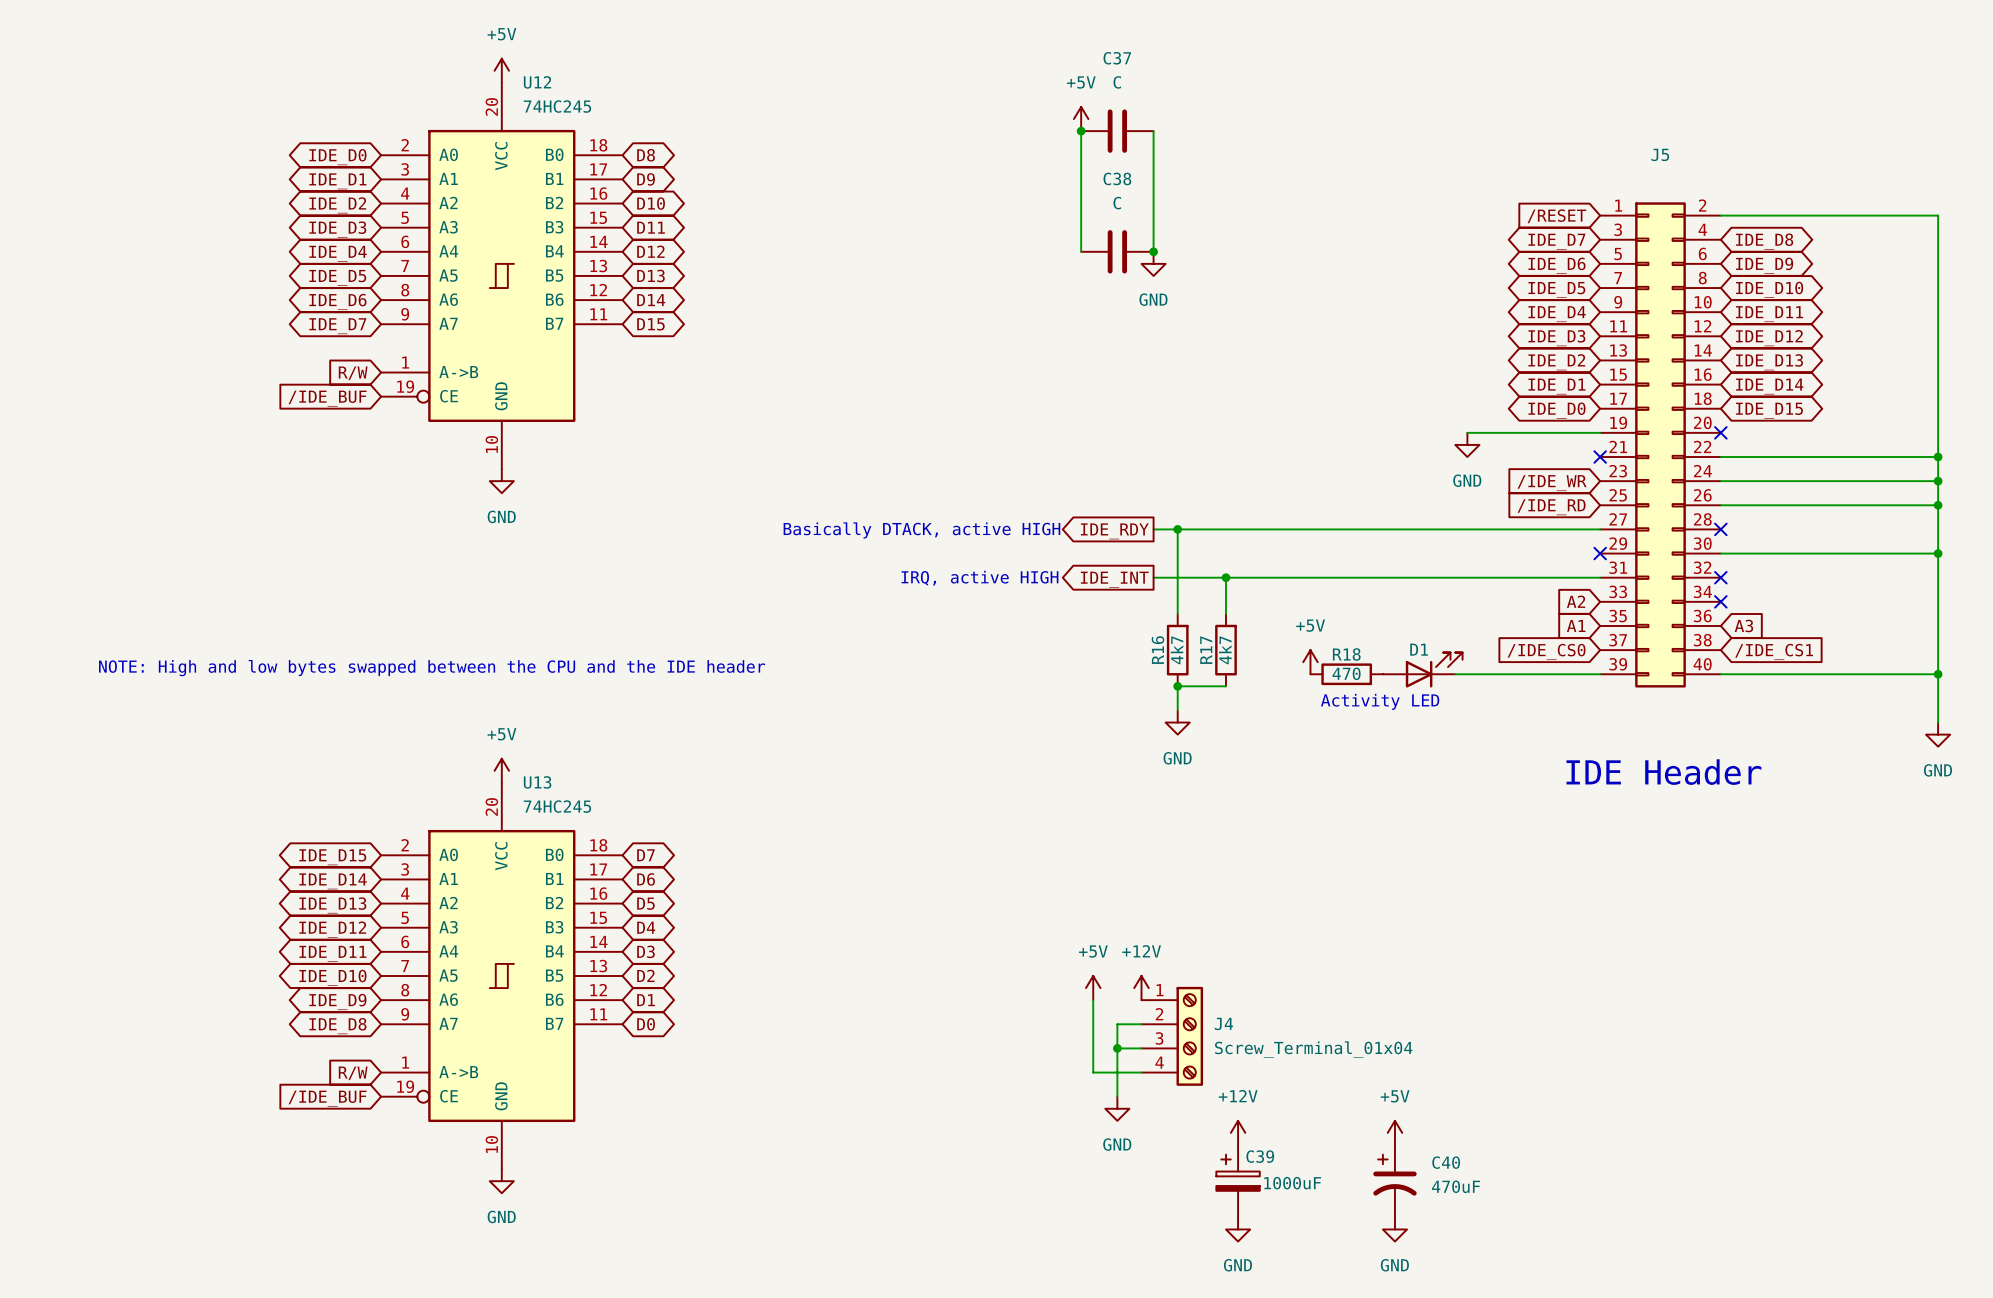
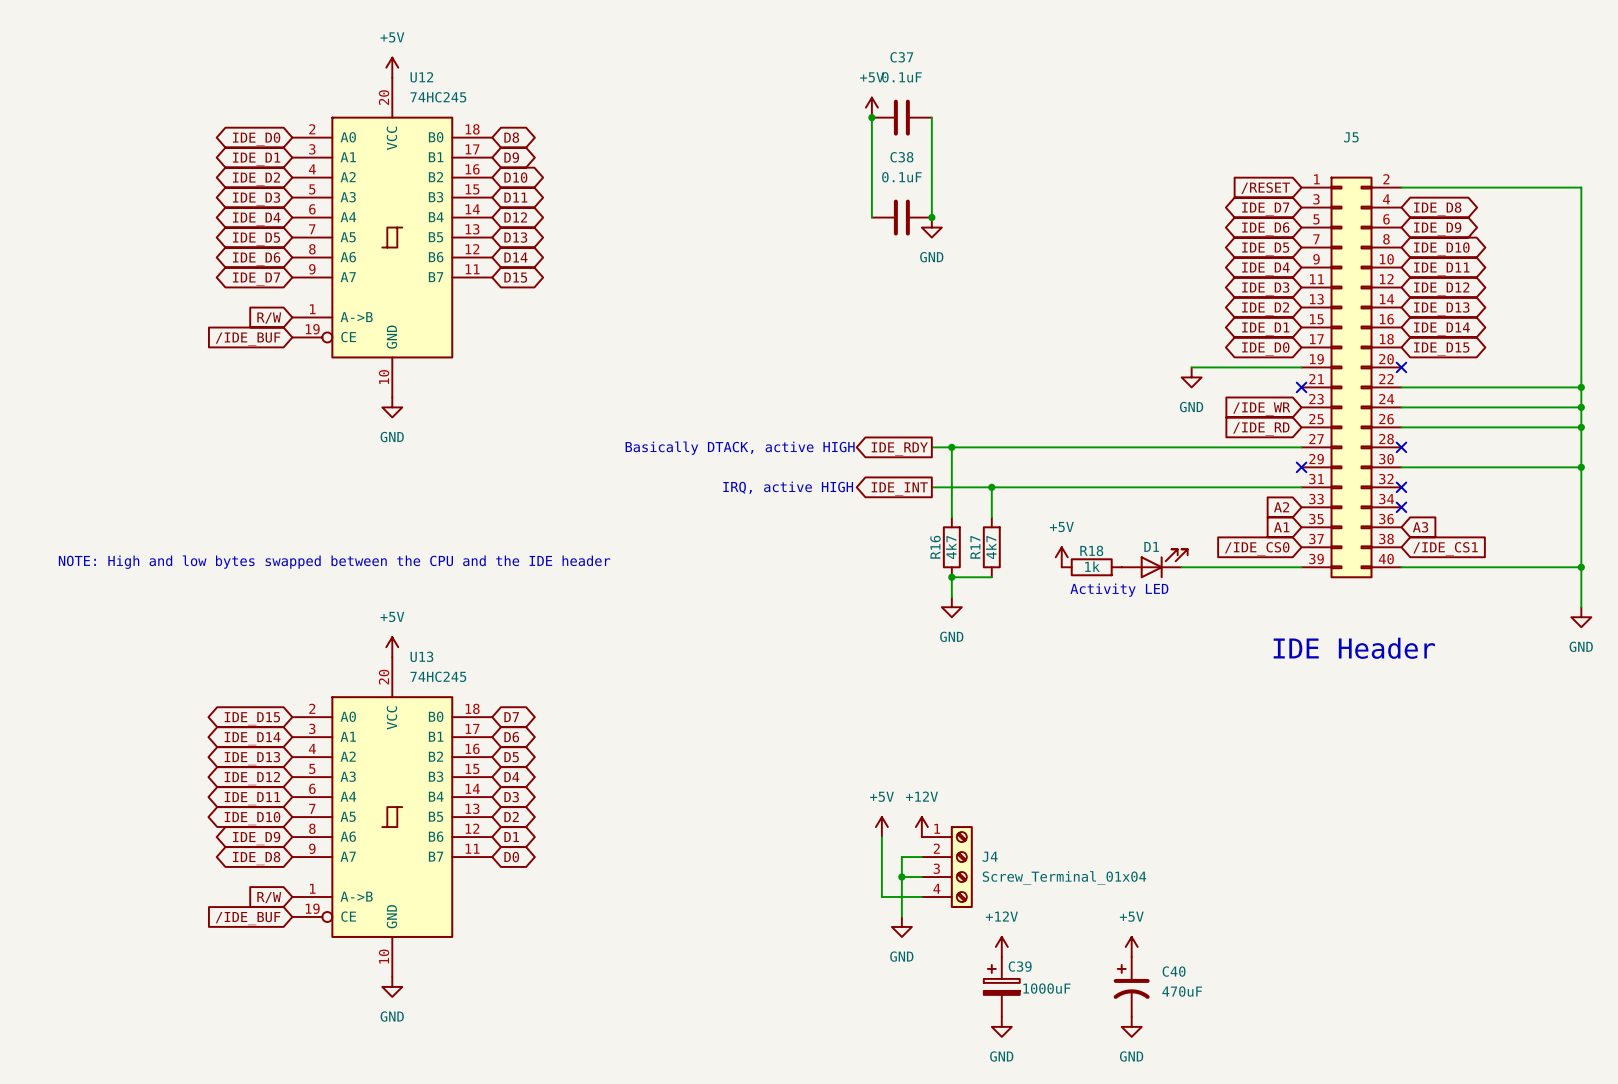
C37 value: C (1117, 82) -> 0.1uF (901, 77)
C38 value: C (1117, 203) -> 0.1uF (901, 177)
R18 value: 470 (1346, 673) -> 1k (1092, 566)

